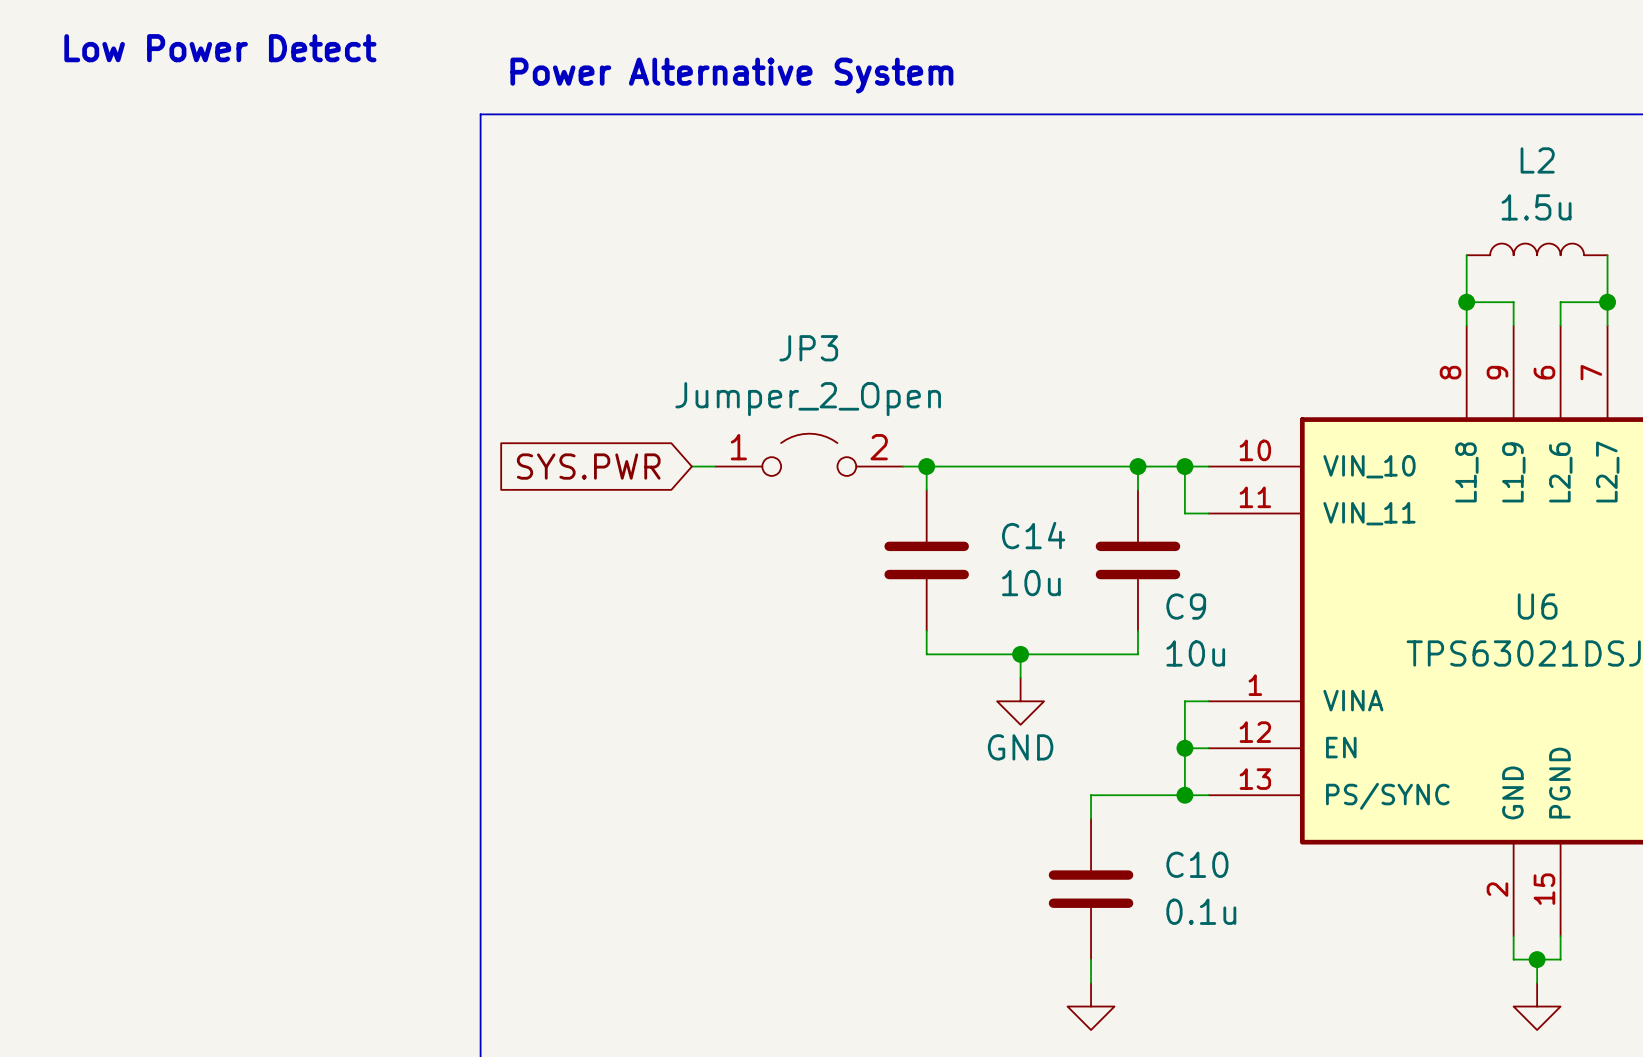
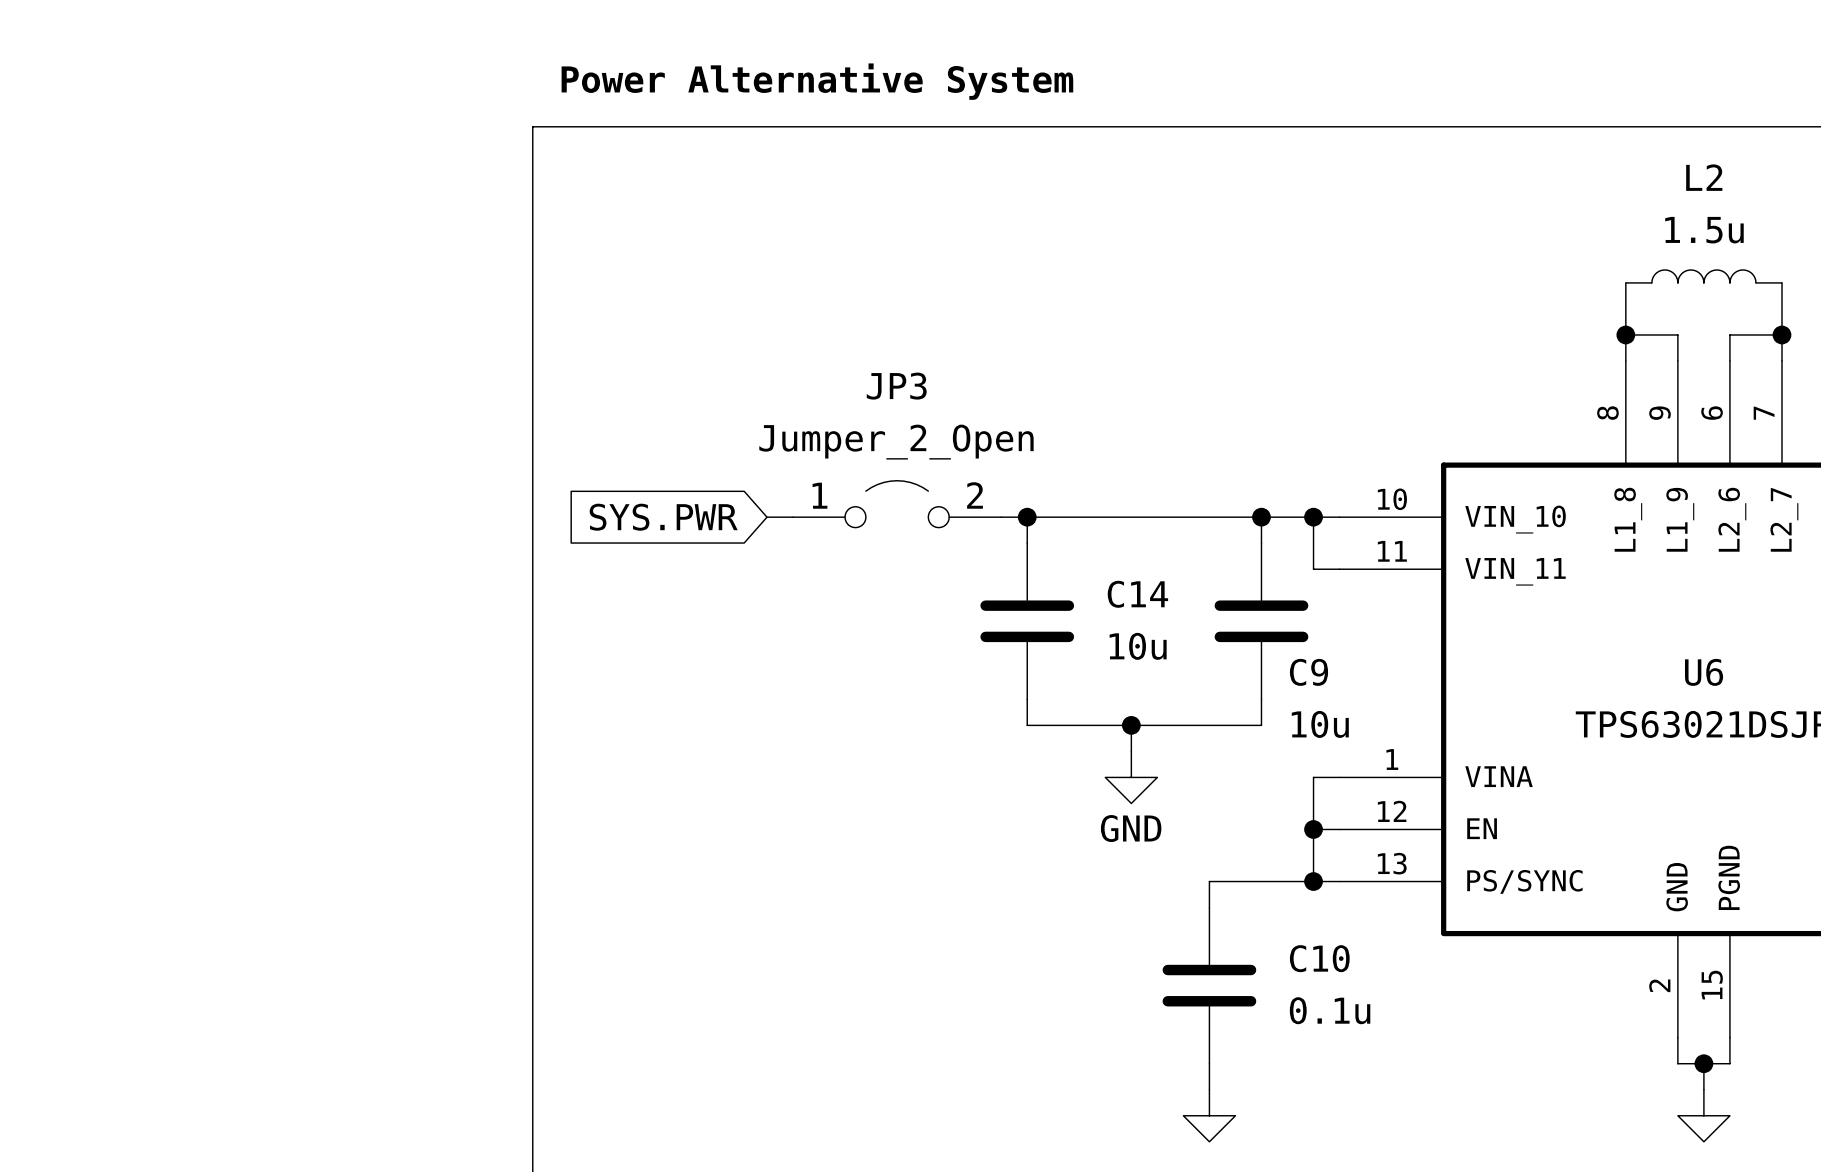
text: Low Power Detect (220, 48) -> none

